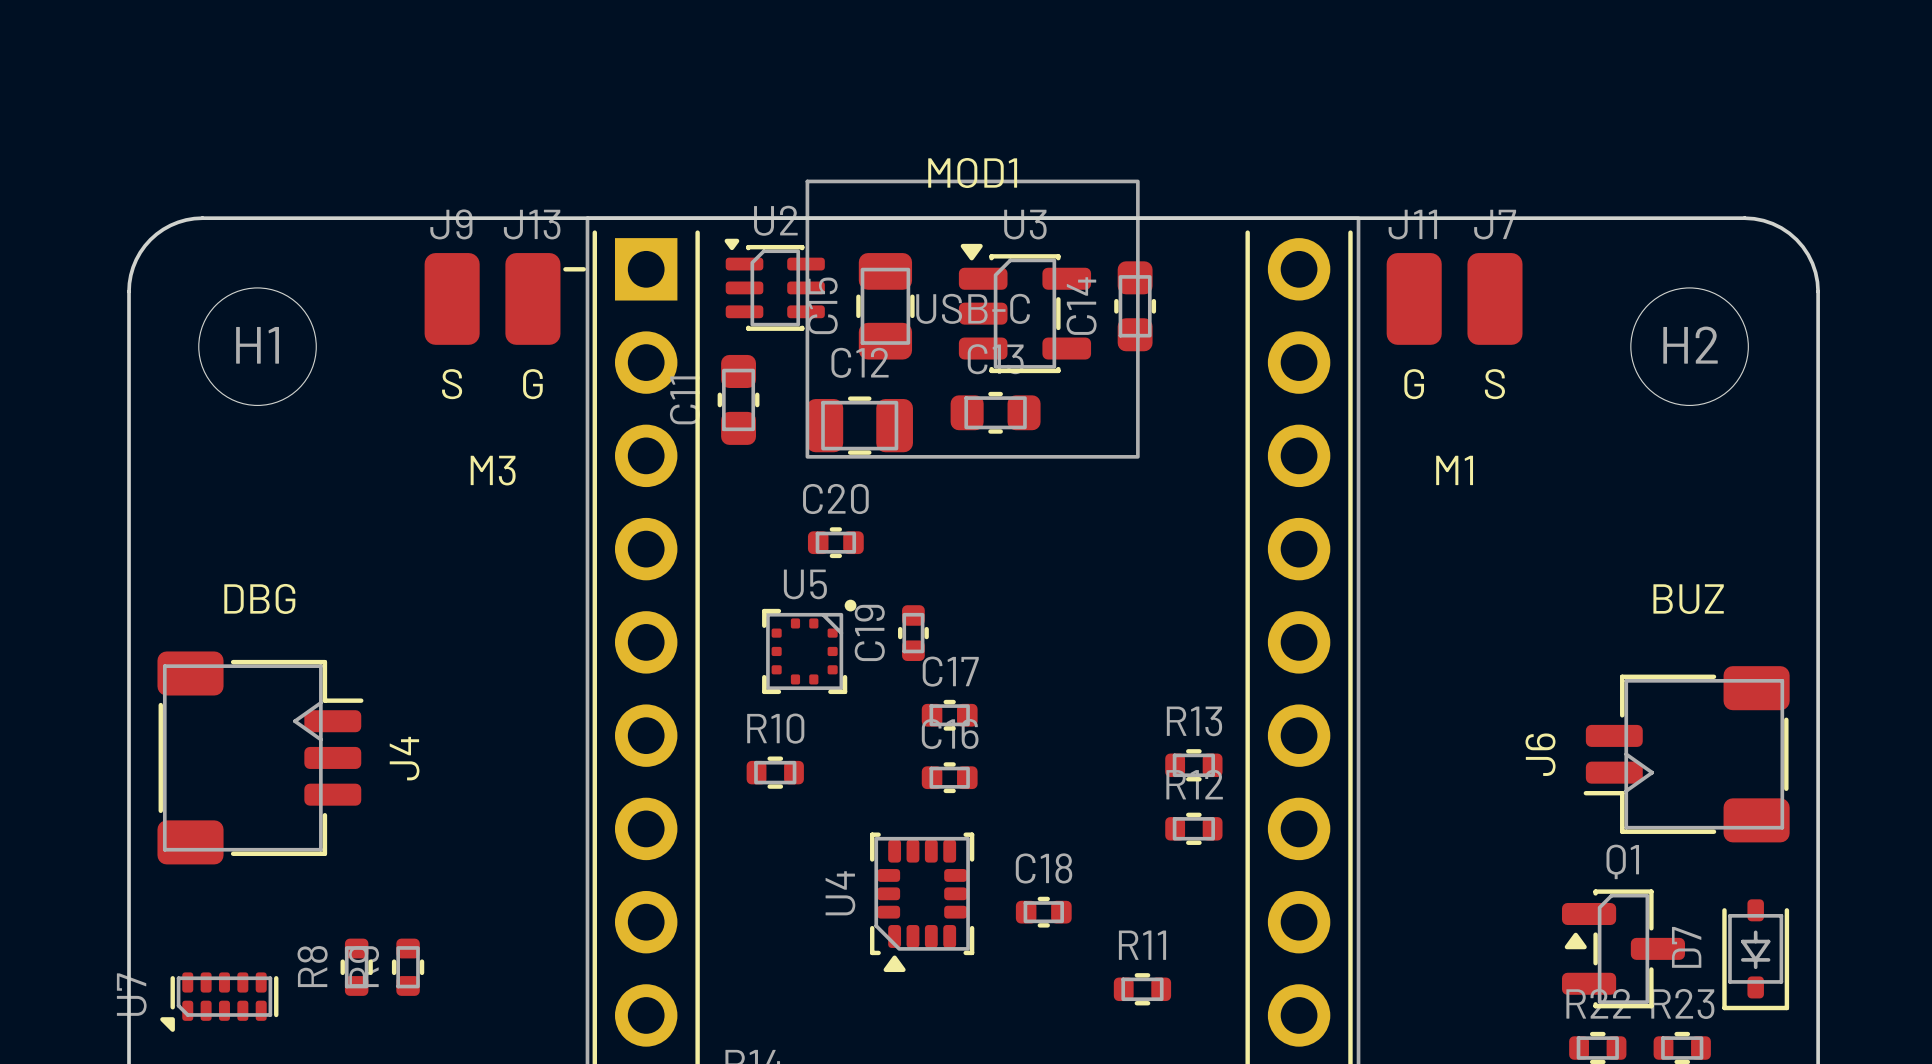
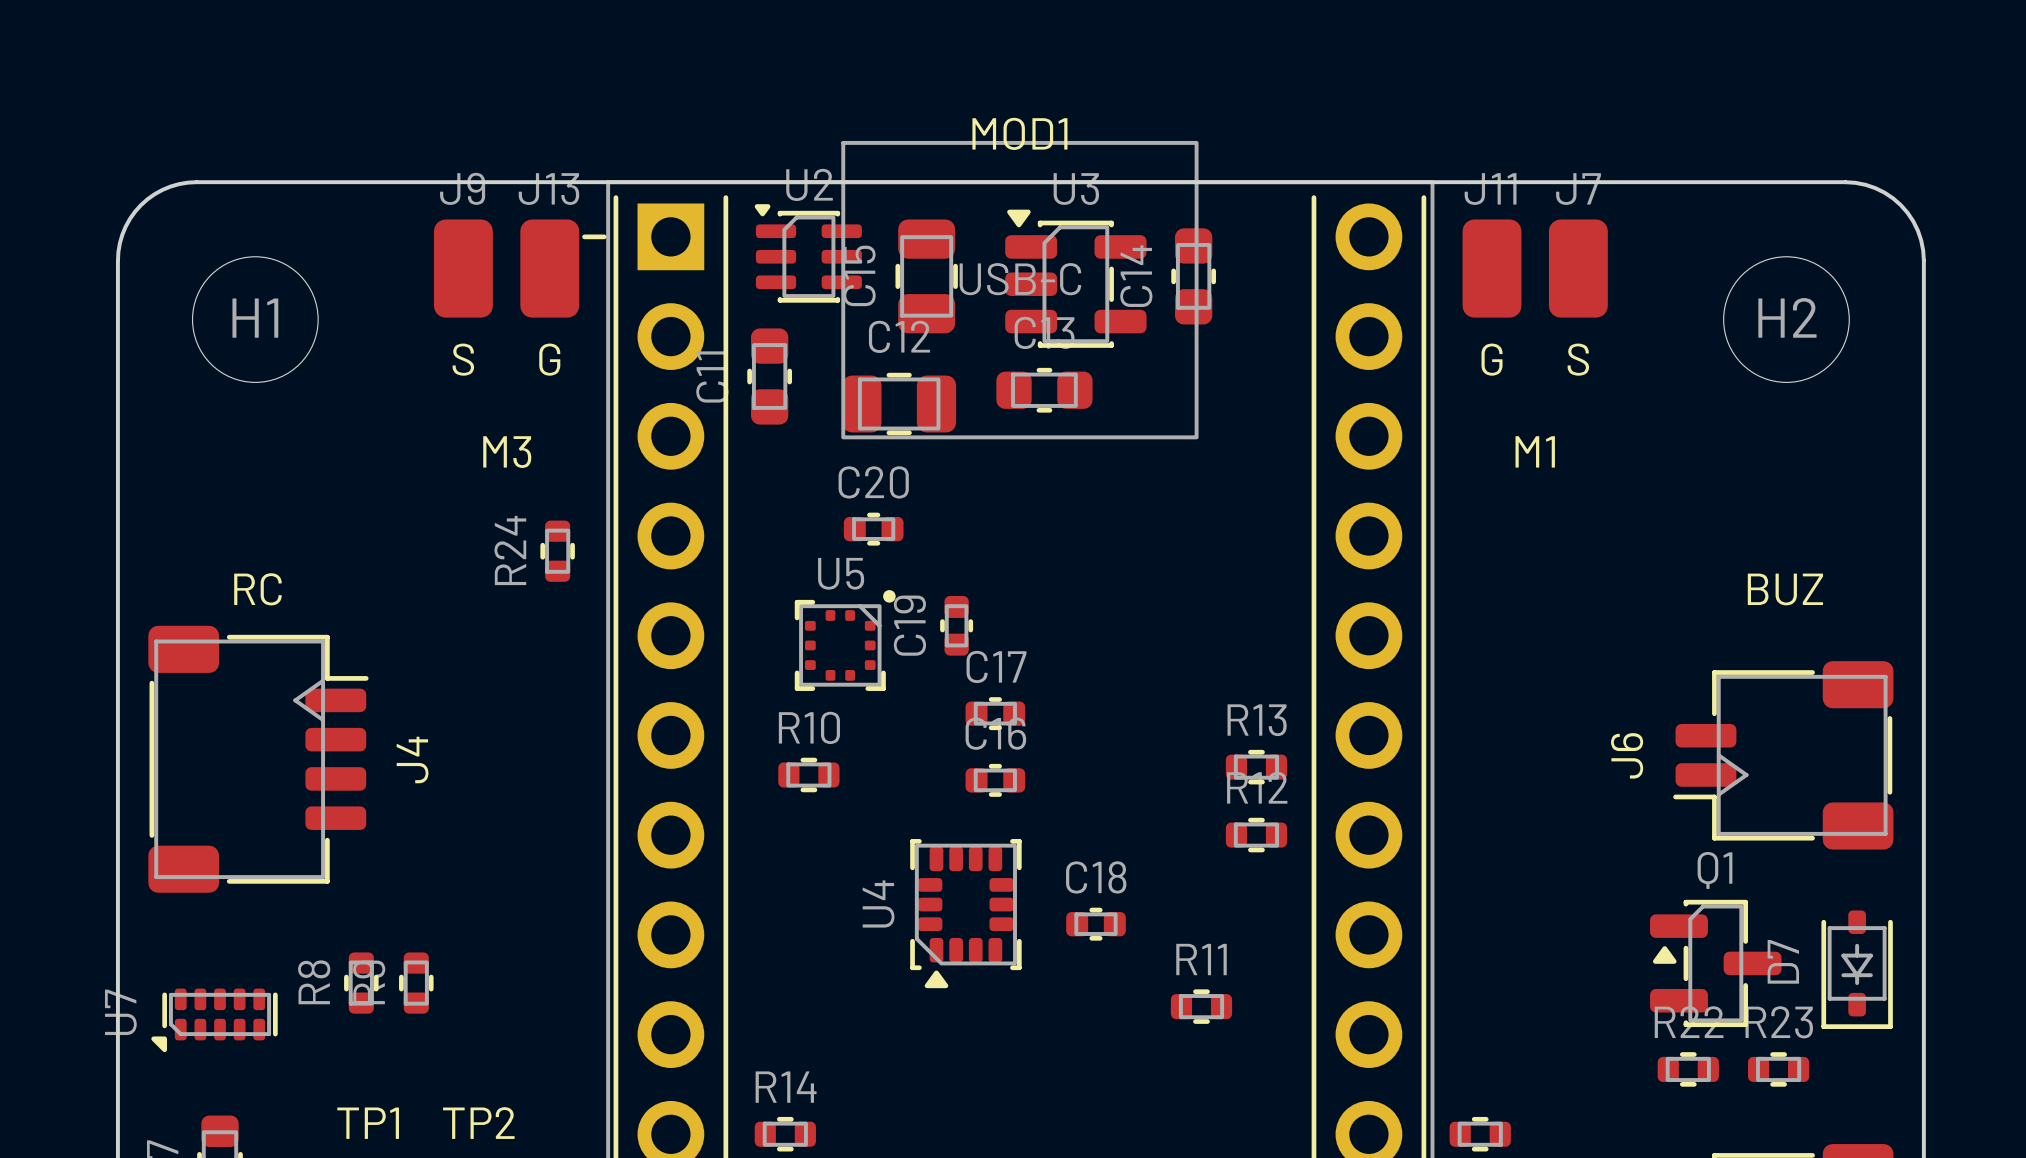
R24: none -> (557, 551)
text: DBG (259, 598) -> RC (257, 589)
J4 footprint: [157, 651, 364, 865] -> [148, 625, 369, 893]

